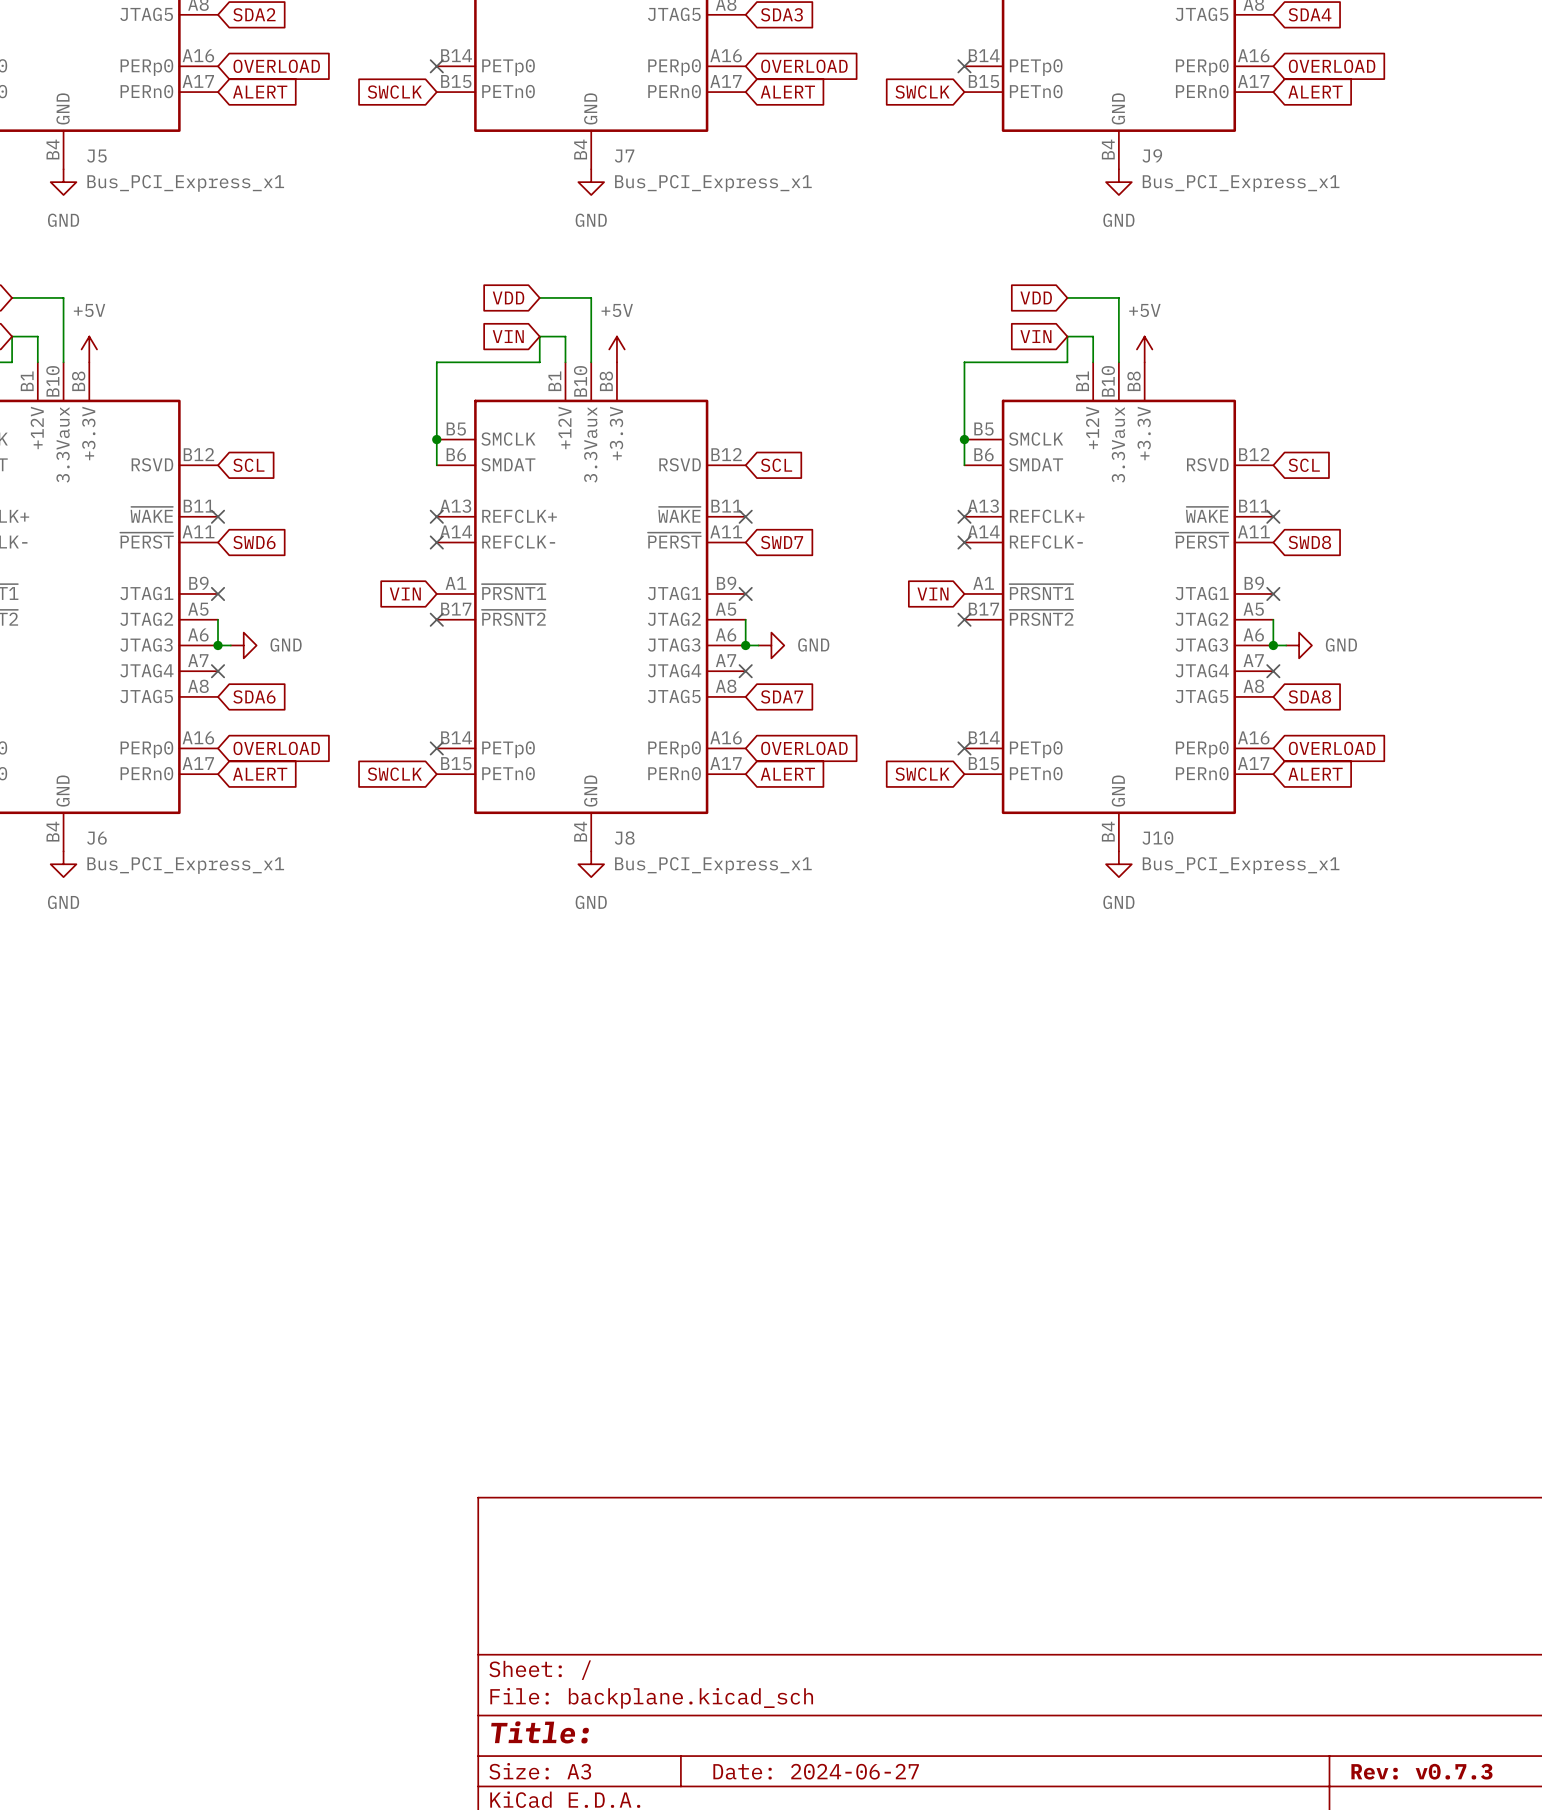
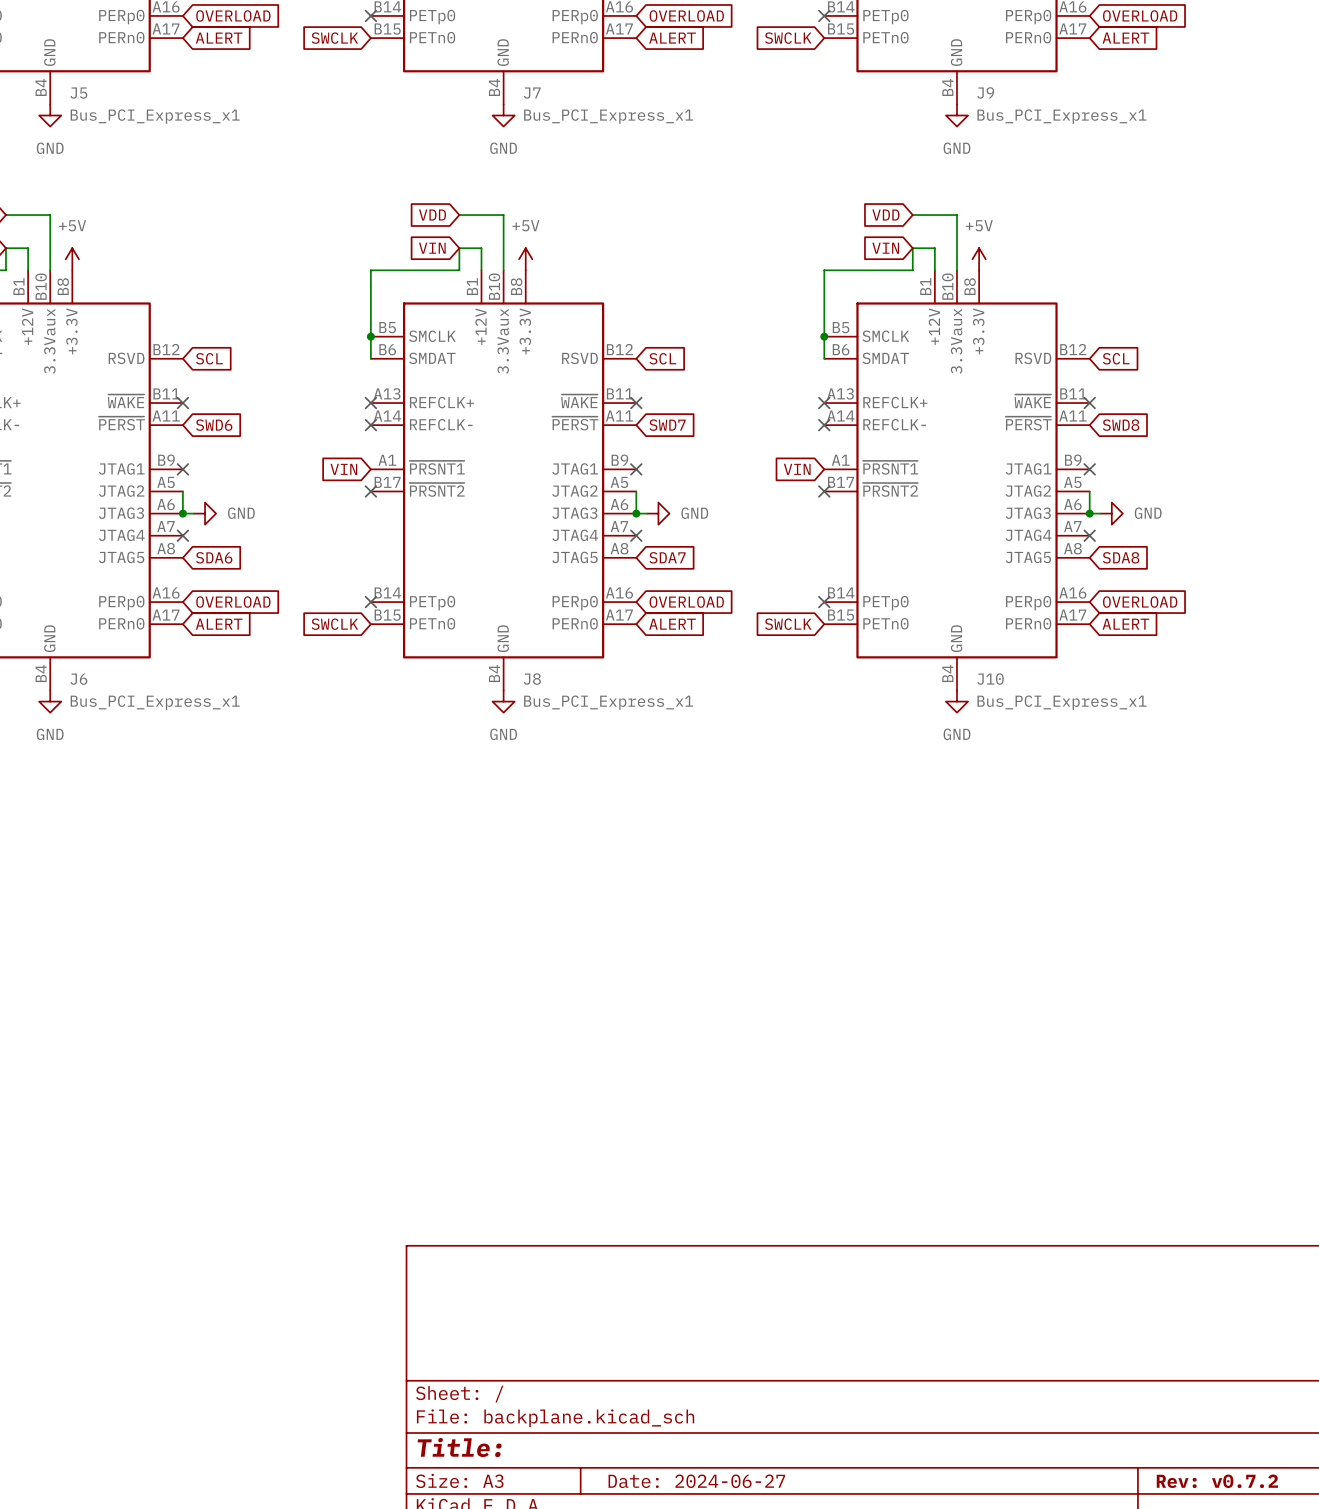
title block: Rev: v0.7.3 (1421, 1771) -> Rev: v0.7.2 (1217, 1481)

